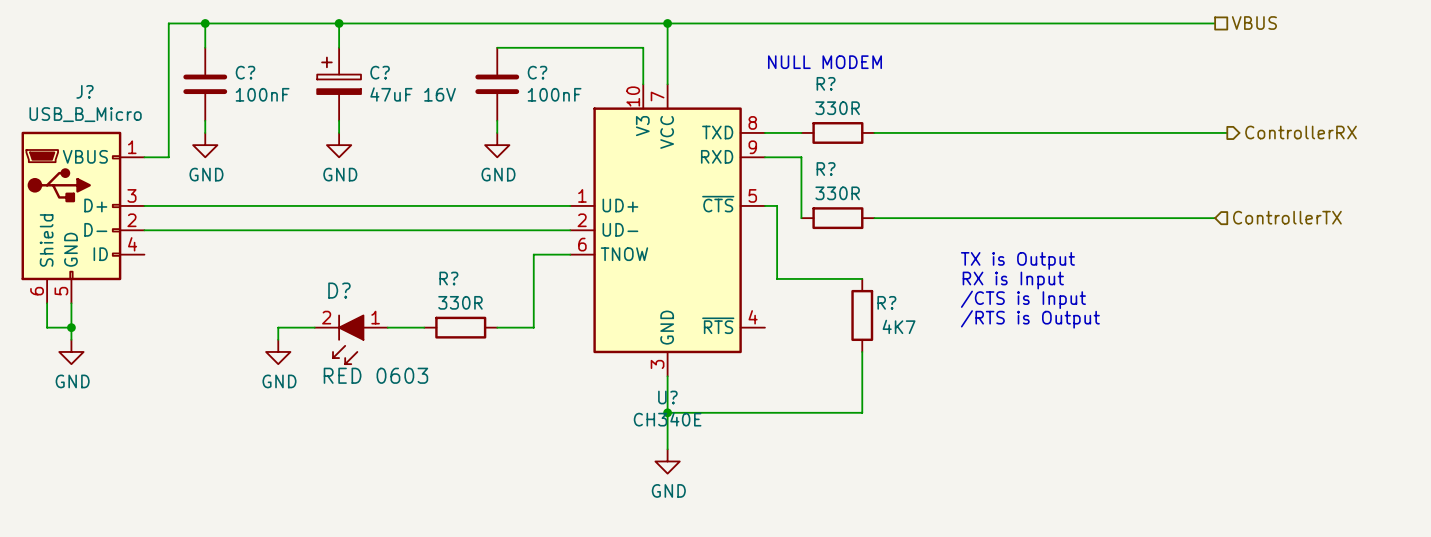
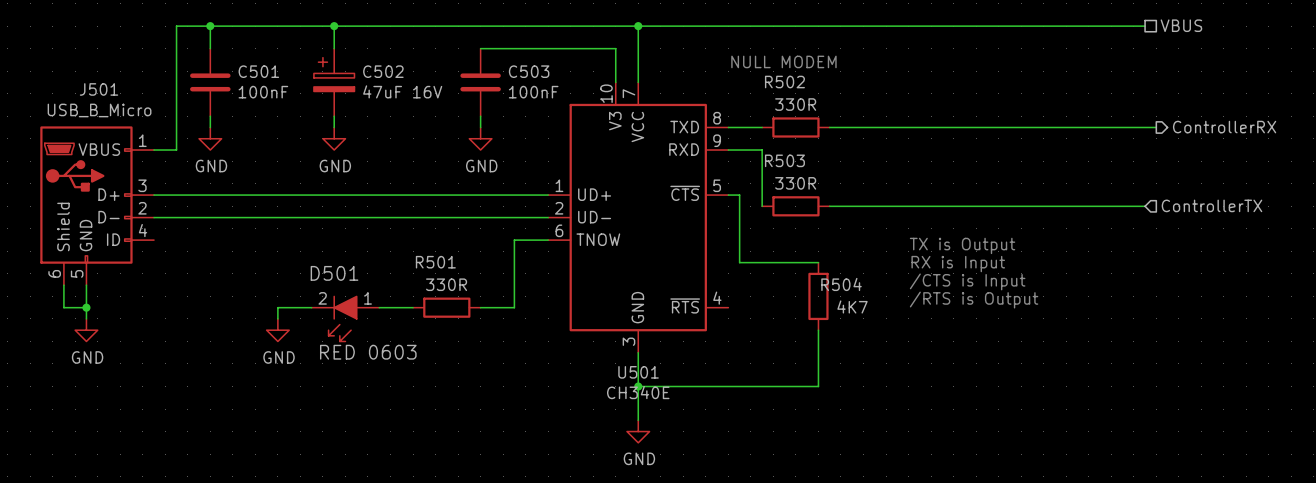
C? name: C? (245, 72) -> C501 (258, 71)
C? name: C? (380, 72) -> C502 (383, 71)
C? name: C? (537, 72) -> C503 (529, 71)
R? name: R? (826, 83) -> R502 (784, 82)
J? name: J? (85, 91) -> J501 (99, 89)
R? name: R? (826, 169) -> R503 (784, 160)
R? name: R? (448, 278) -> R501 (435, 262)
D? name: D? (339, 290) -> D501 (334, 273)
R? name: R? (886, 302) -> R504 (841, 284)
U? name: U? (667, 397) -> U501 (638, 372)

